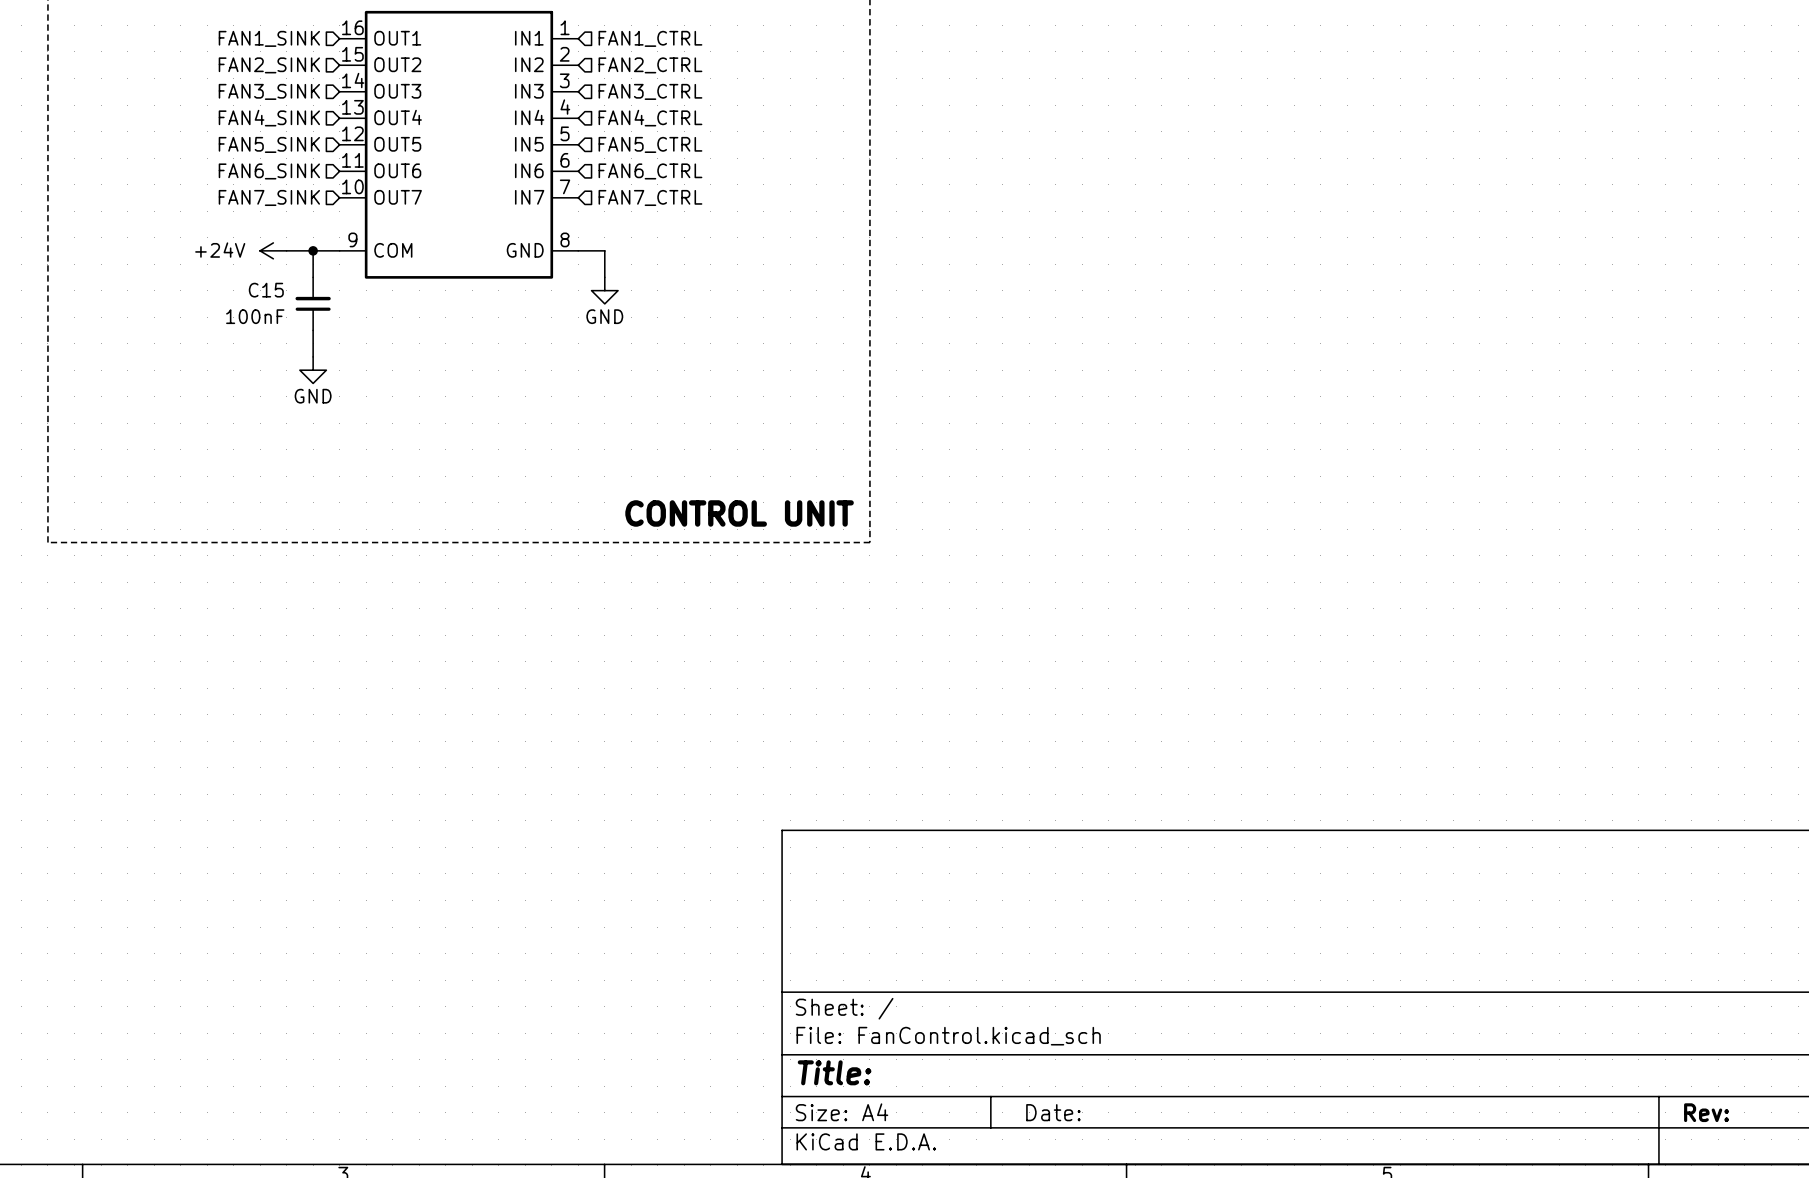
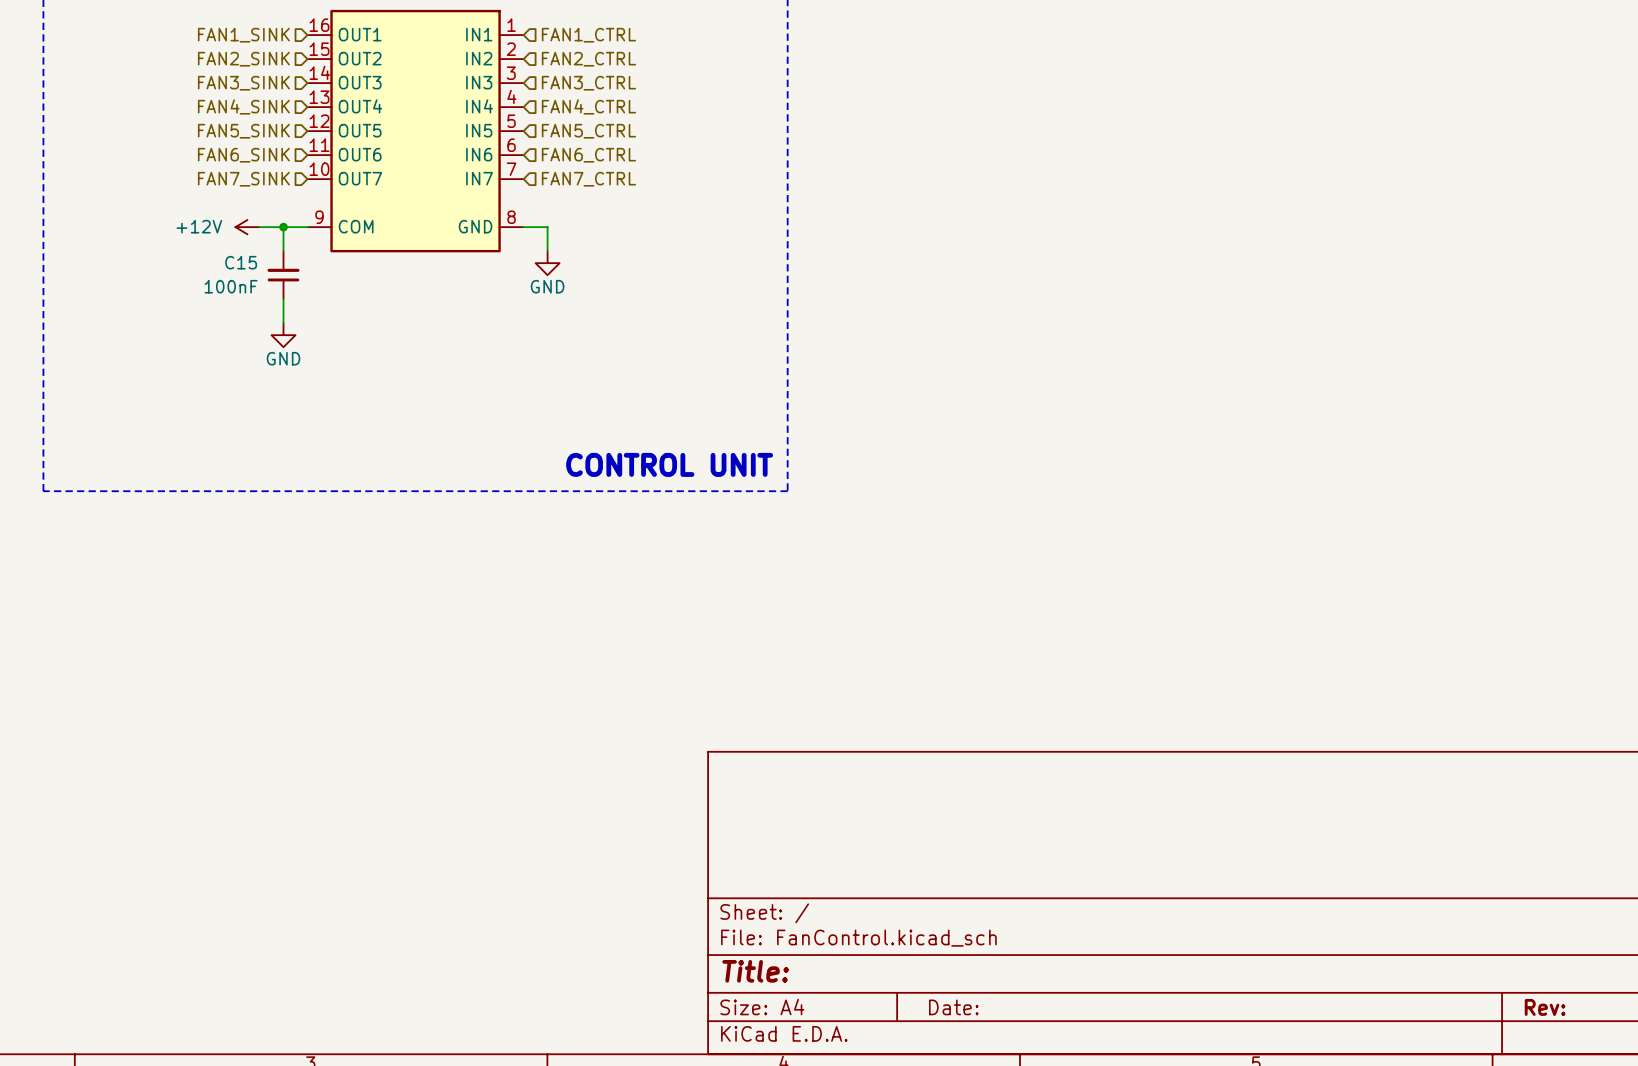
power symbol: +24V (273, 250) -> +12V (247, 227)

